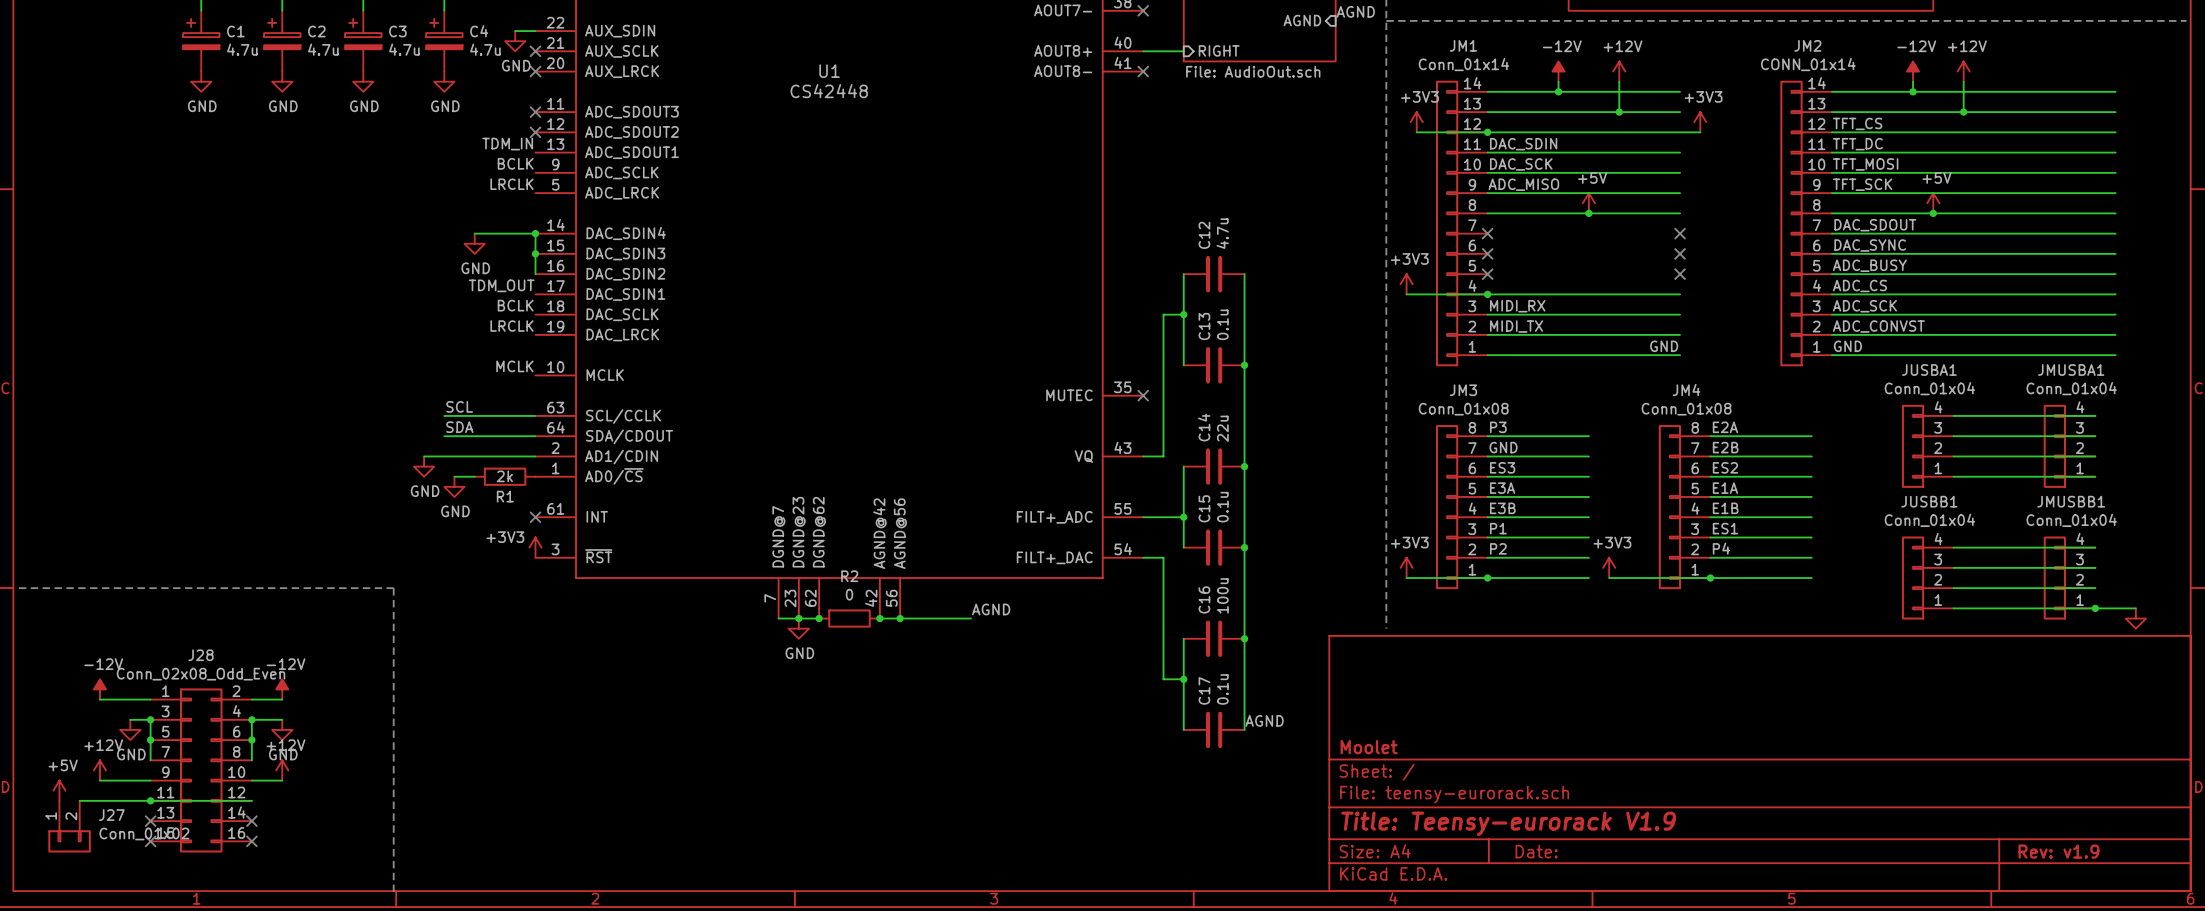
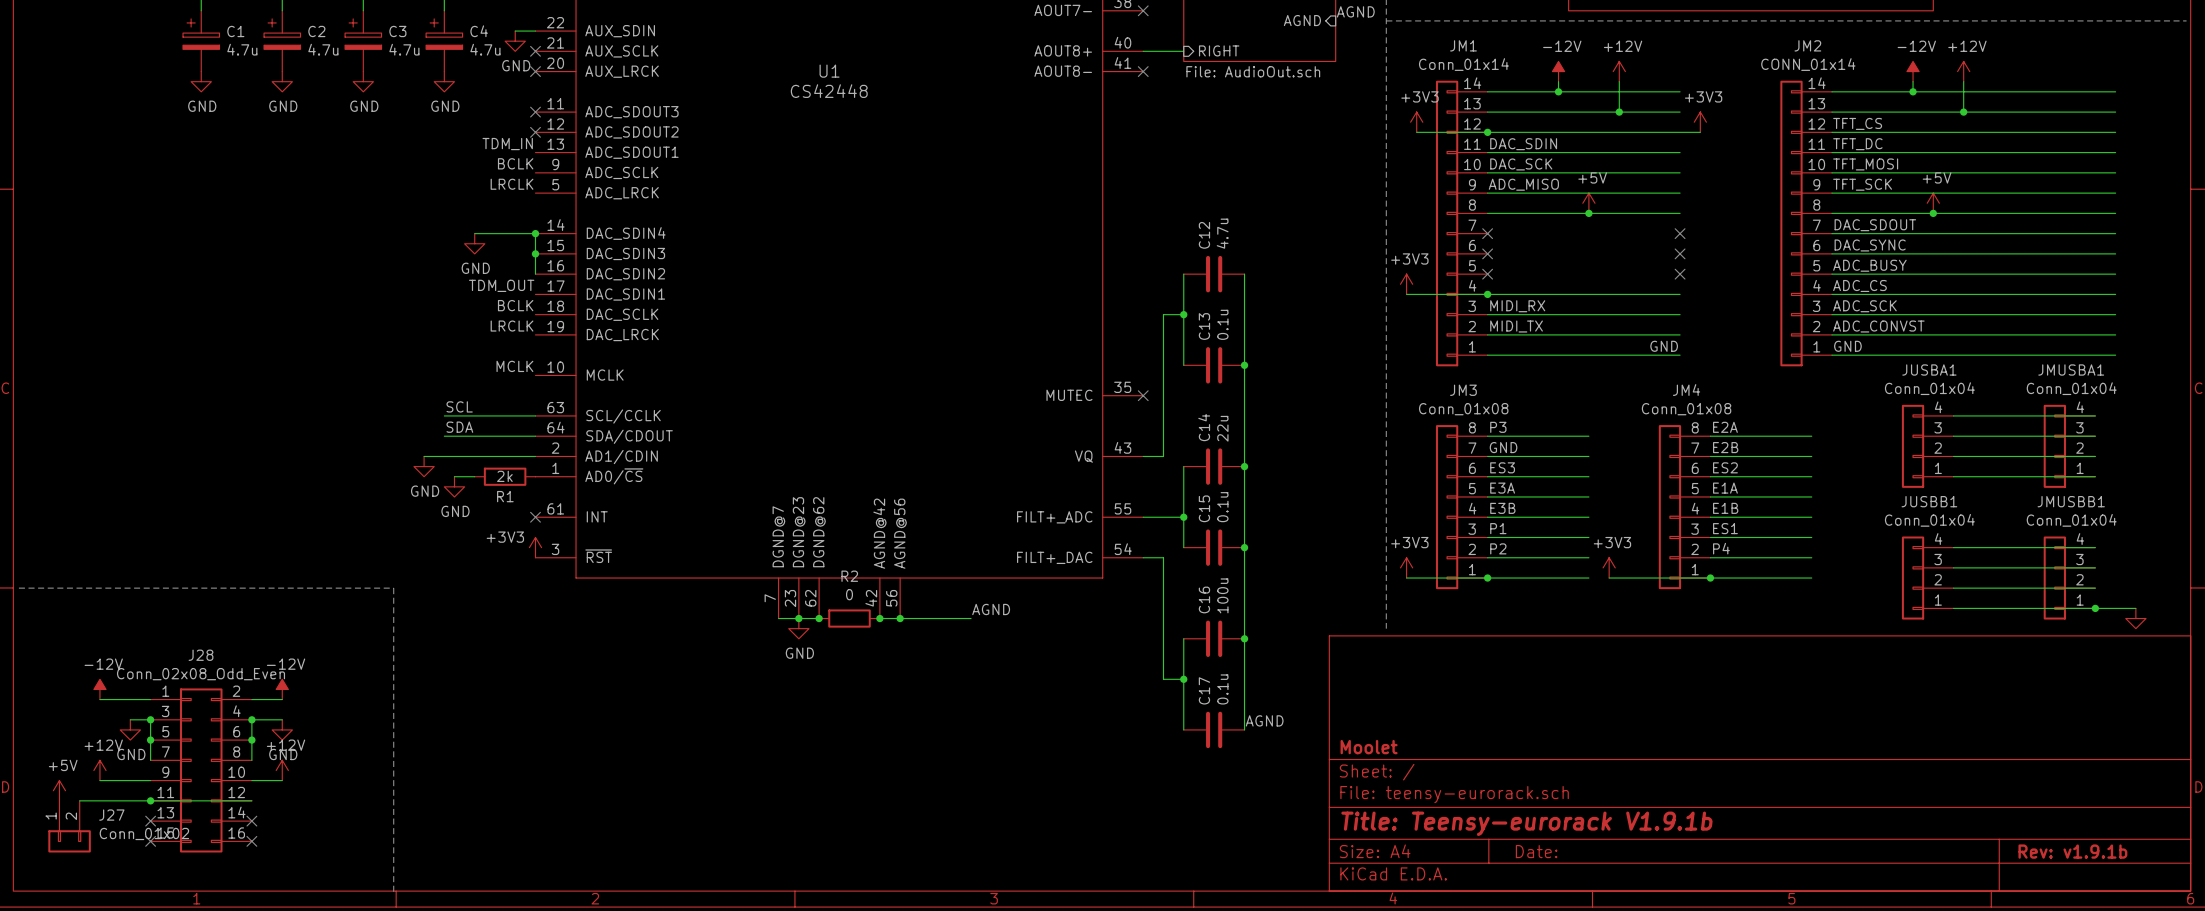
title block: Title: Teensy-eurorack V1.9 (1508, 823) -> Title: Teensy-eurorack V1.9.1b (1526, 823)
title block: Rev: v1.9 (2058, 851) -> Rev: v1.9.1b (2072, 851)

